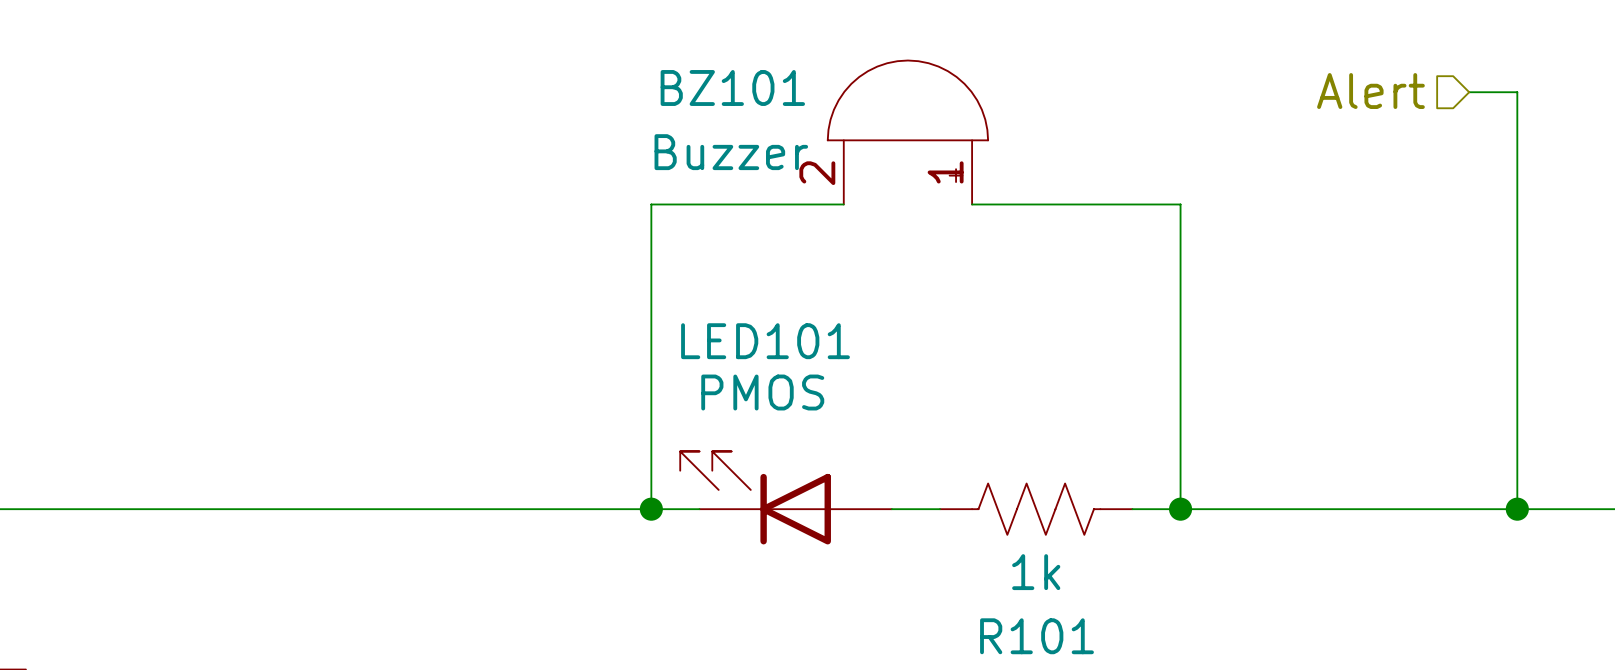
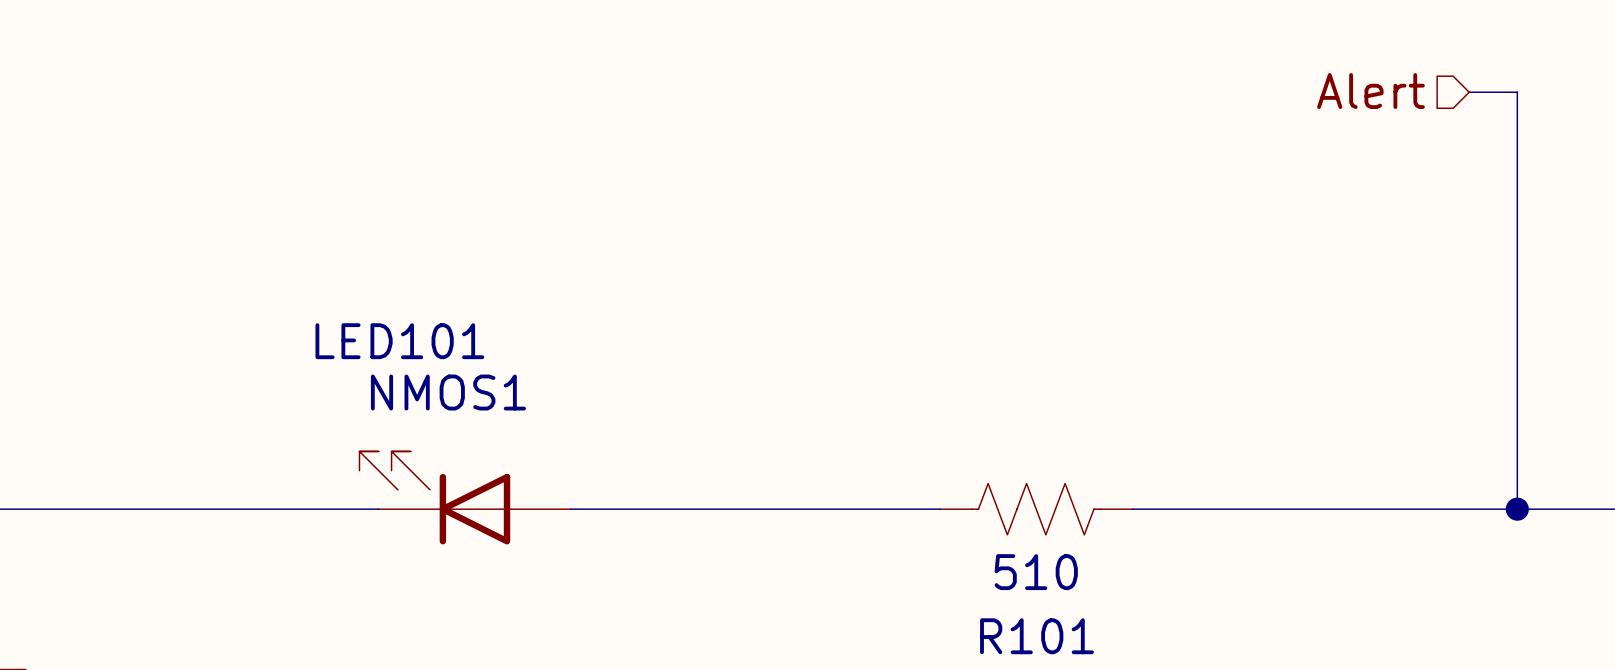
BZ101: Buzzer (907, 132) -> none
wire: (843, 204) (651, 204) (651, 509) -> none
wire: (972, 204) (1180, 204) (1180, 509) -> none
LED101 name position: LED101 (765, 341) -> LED101 (399, 341)
LED101 value: PMOS (762, 392) -> NMOS1 (448, 392)
LED101 position: (786, 497) -> (465, 497)
junction: (651, 509) -> none
junction: (1180, 509) -> none
R101 value: 1k (1036, 572) -> 510 (1036, 572)

